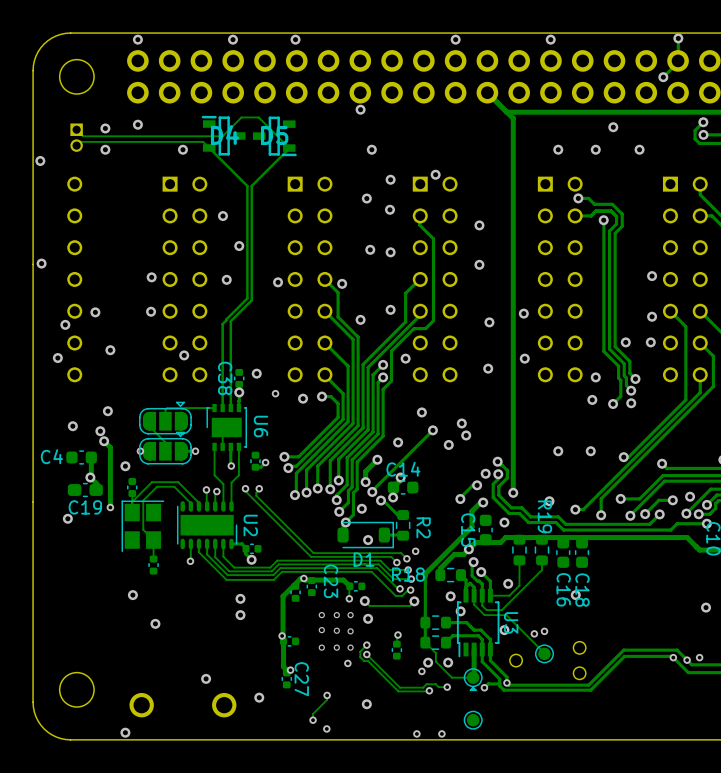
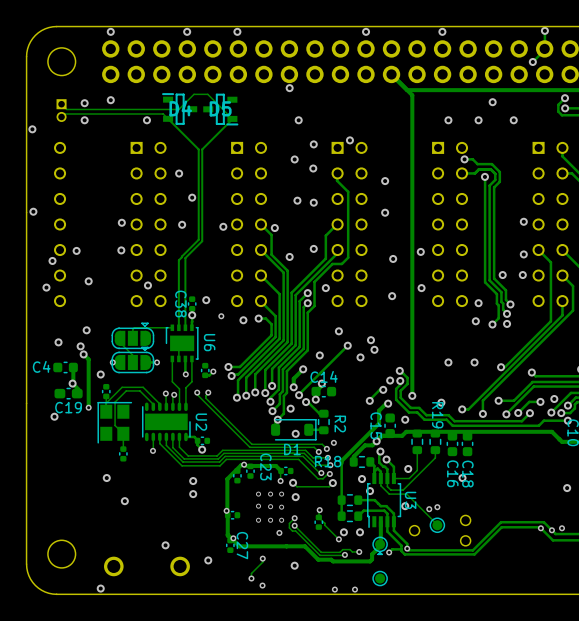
track: (425, 642) (435, 653) (435, 661) (451, 677) (473, 677) -> none
track: none -> (318, 517) (324, 522)
track: none -> (324, 522) (338, 539)
track: none -> (227, 534) (239, 546) (304, 546) (318, 559) (370, 561) (372, 559)
track: none -> (380, 545) (372, 554) (372, 559)

